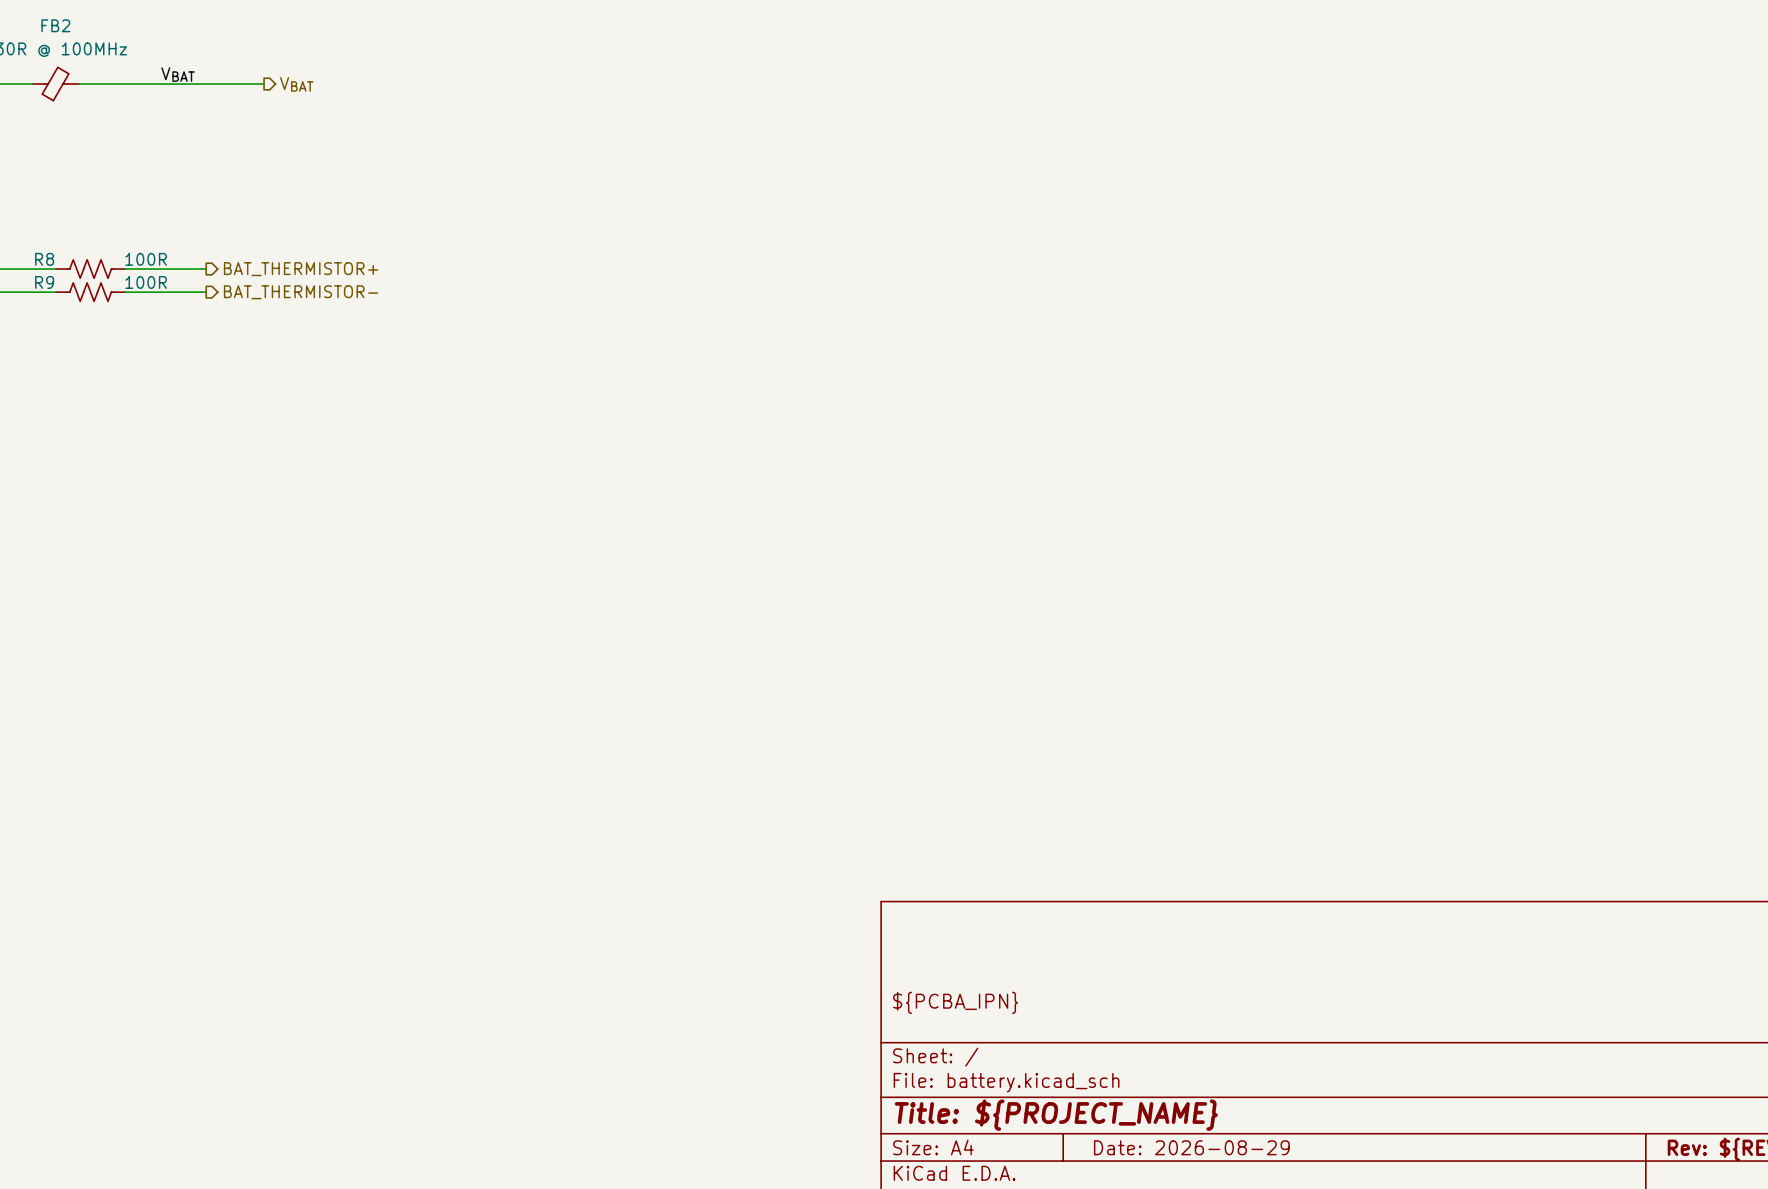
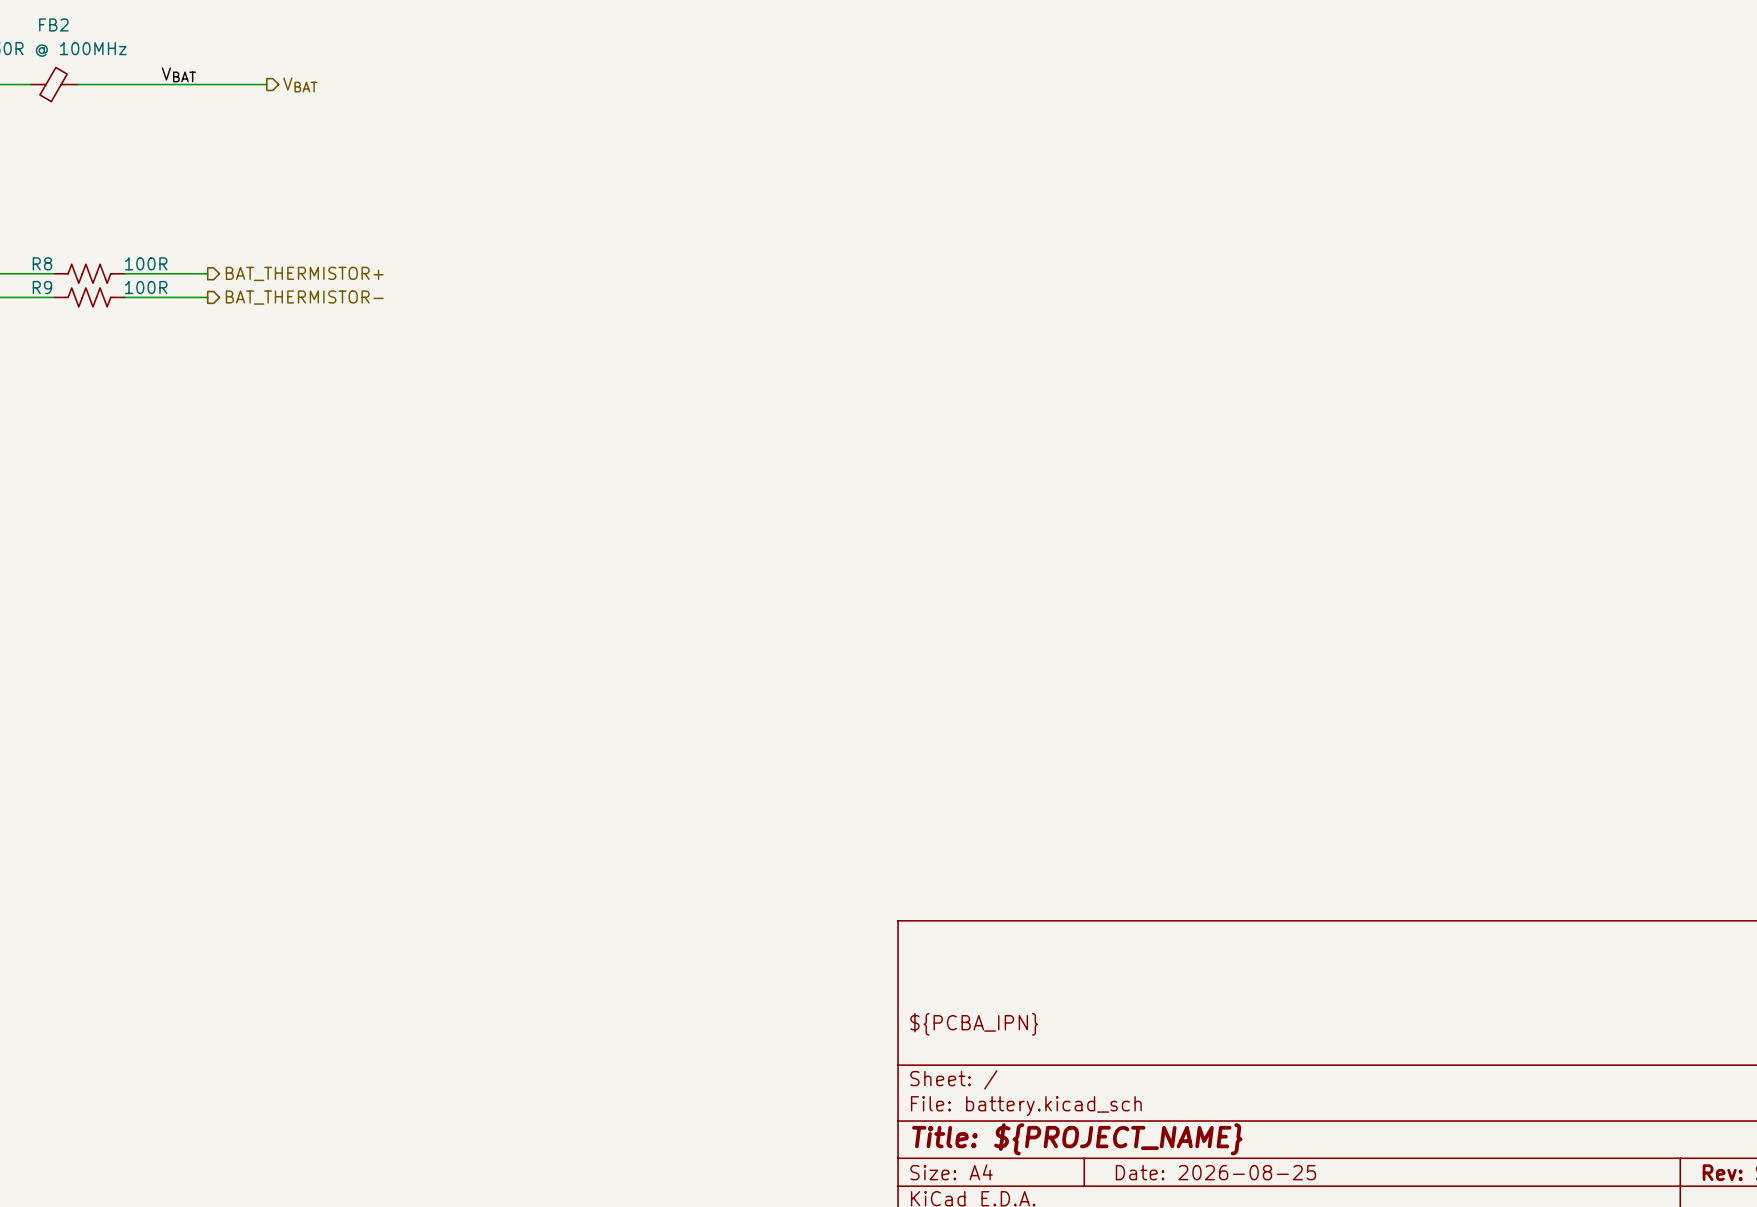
title block: Date: 2026-08-29 (1191, 1147) -> Date: 2026-08-25 (1215, 1172)

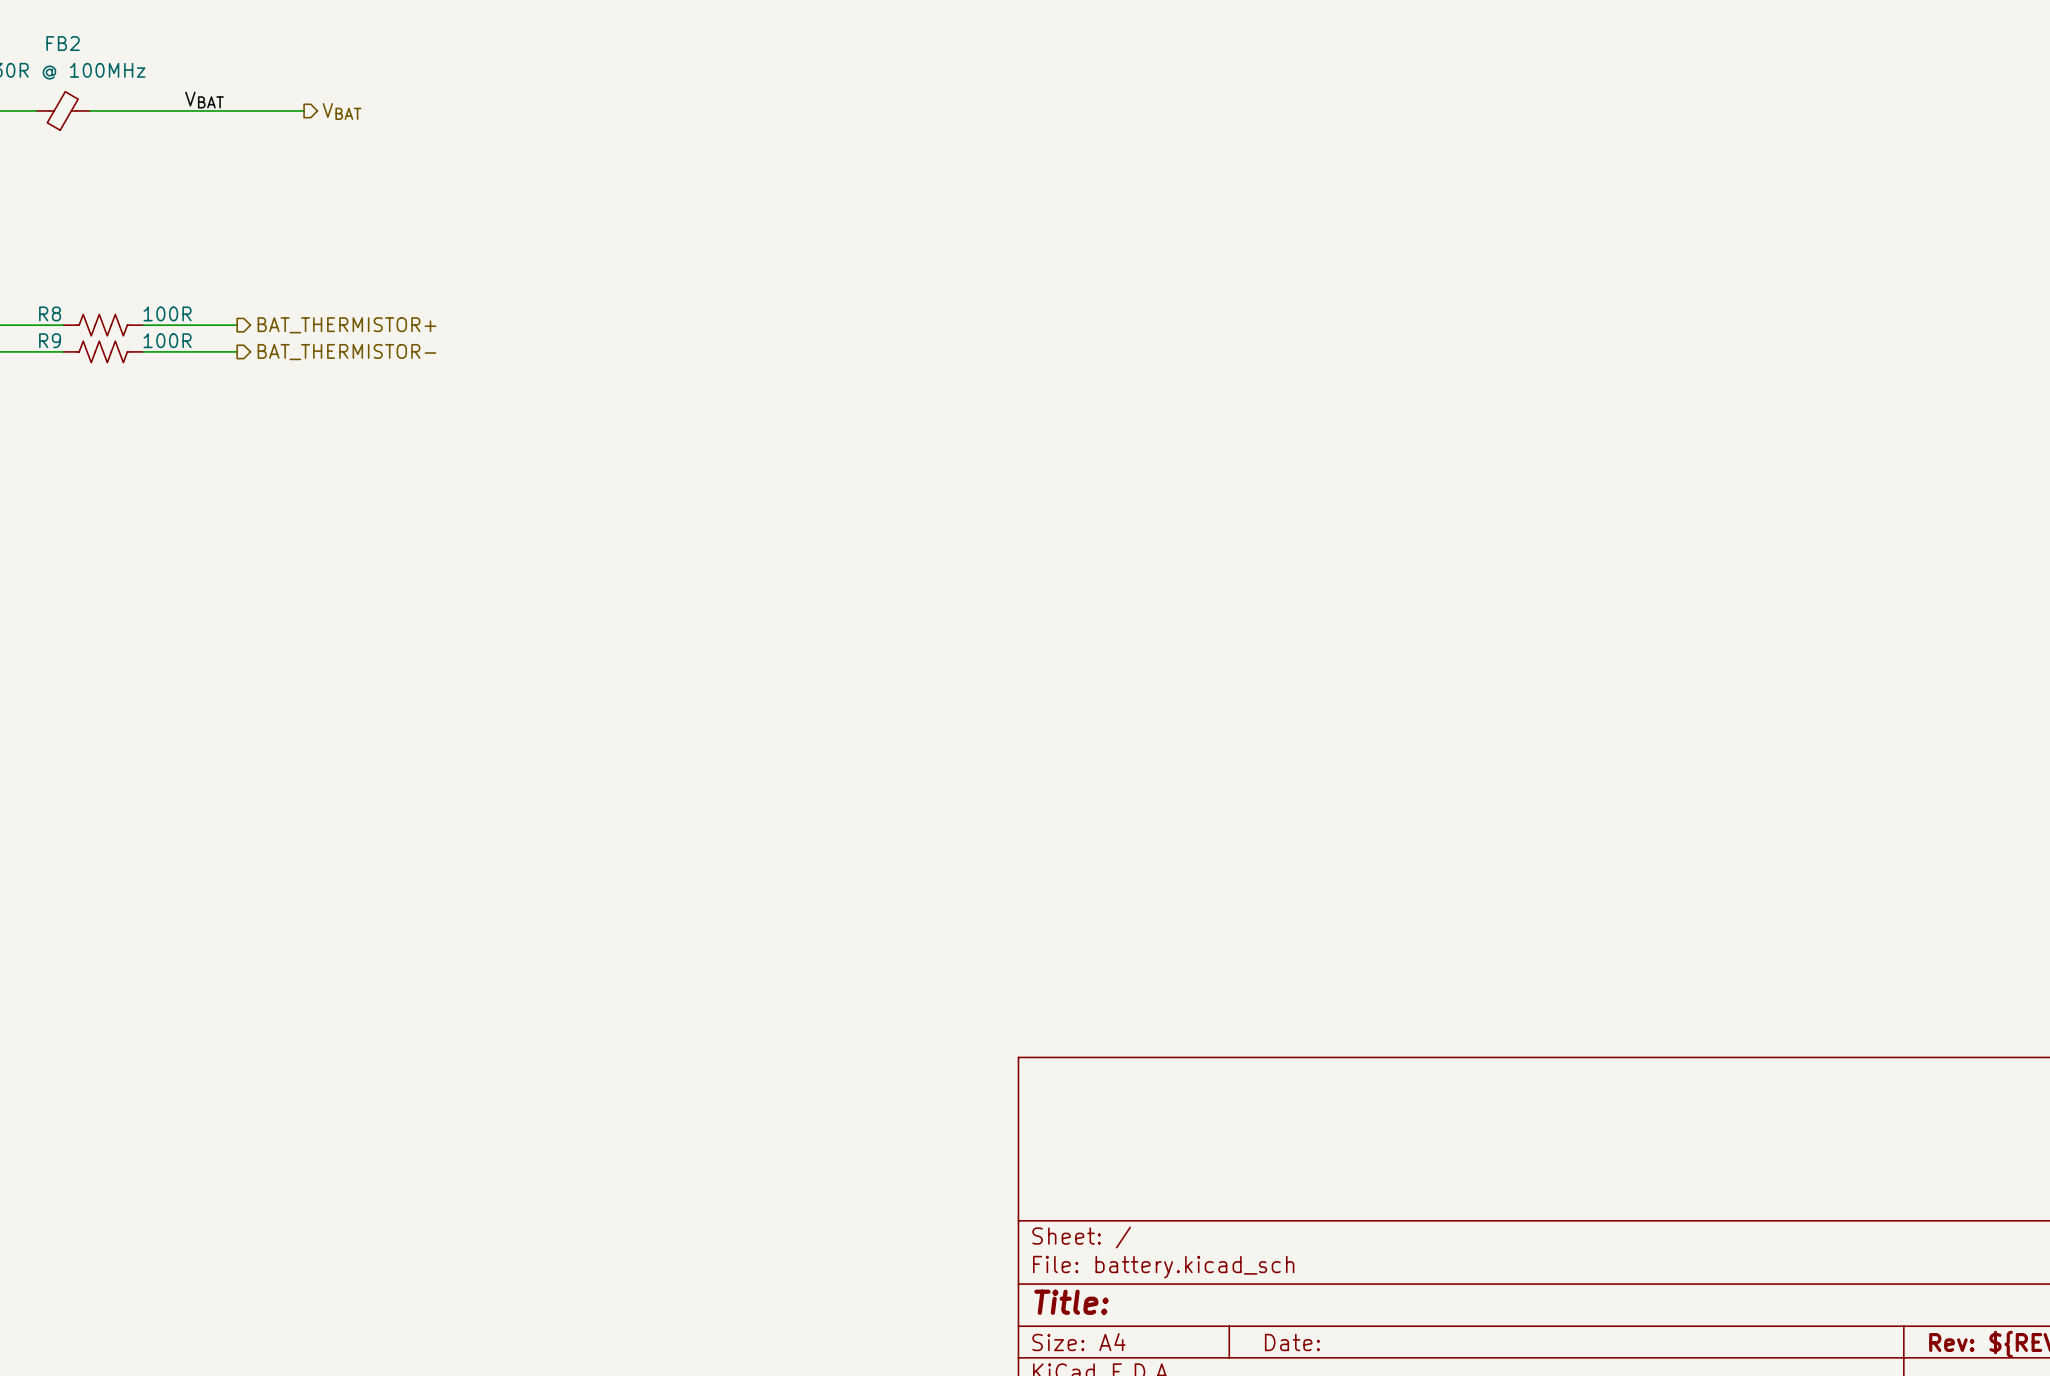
title block: ${PCBA_IPN} (974, 1024) -> none
title block: Title: ${PROJECT_NAME} (1077, 1139) -> Title: (1071, 1302)
title block: Date: 2026-08-25 (1215, 1172) -> Date: (1292, 1342)

